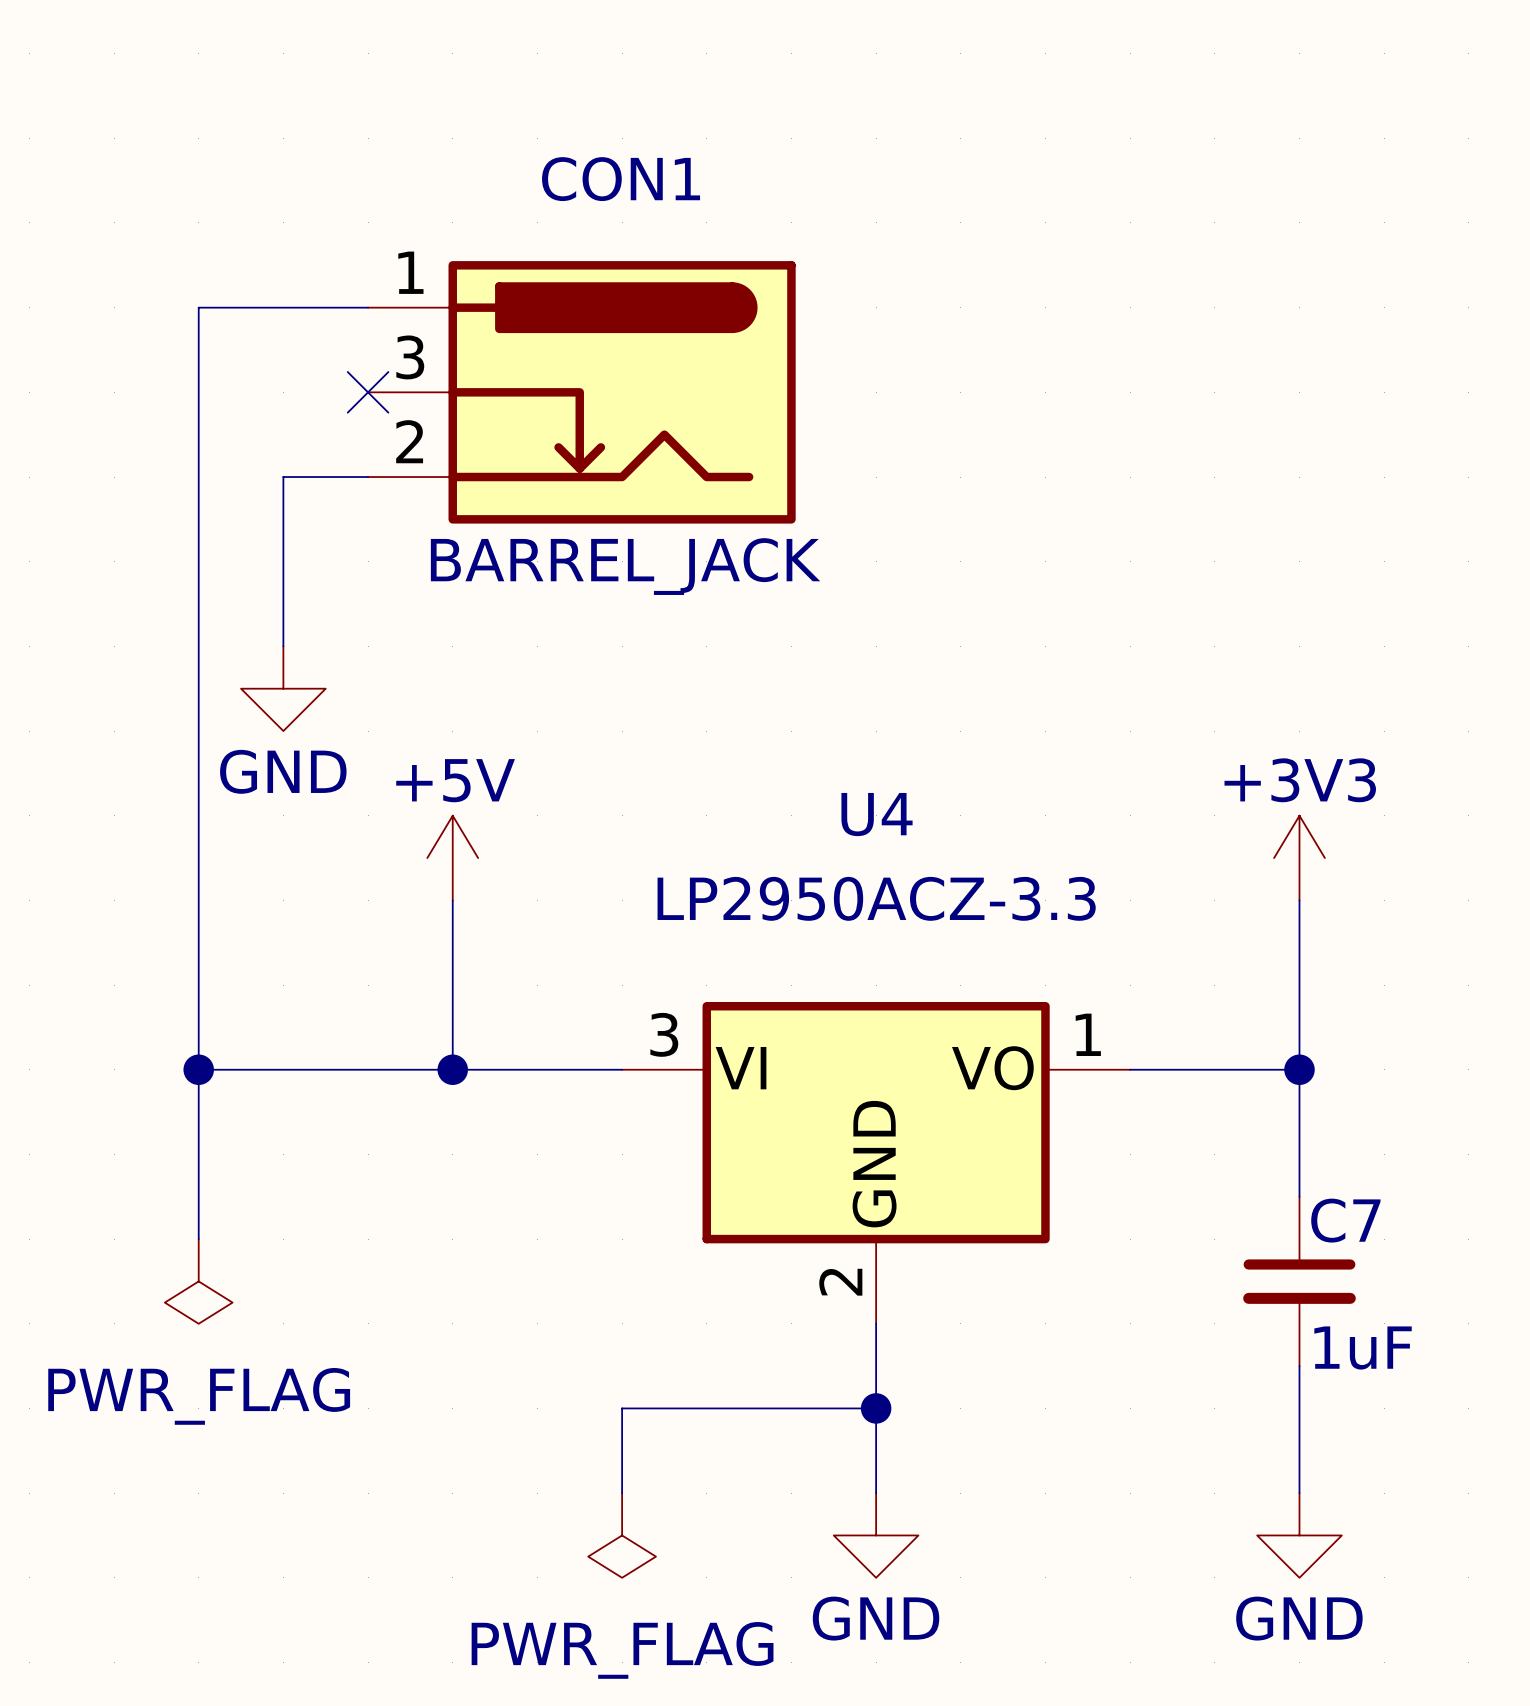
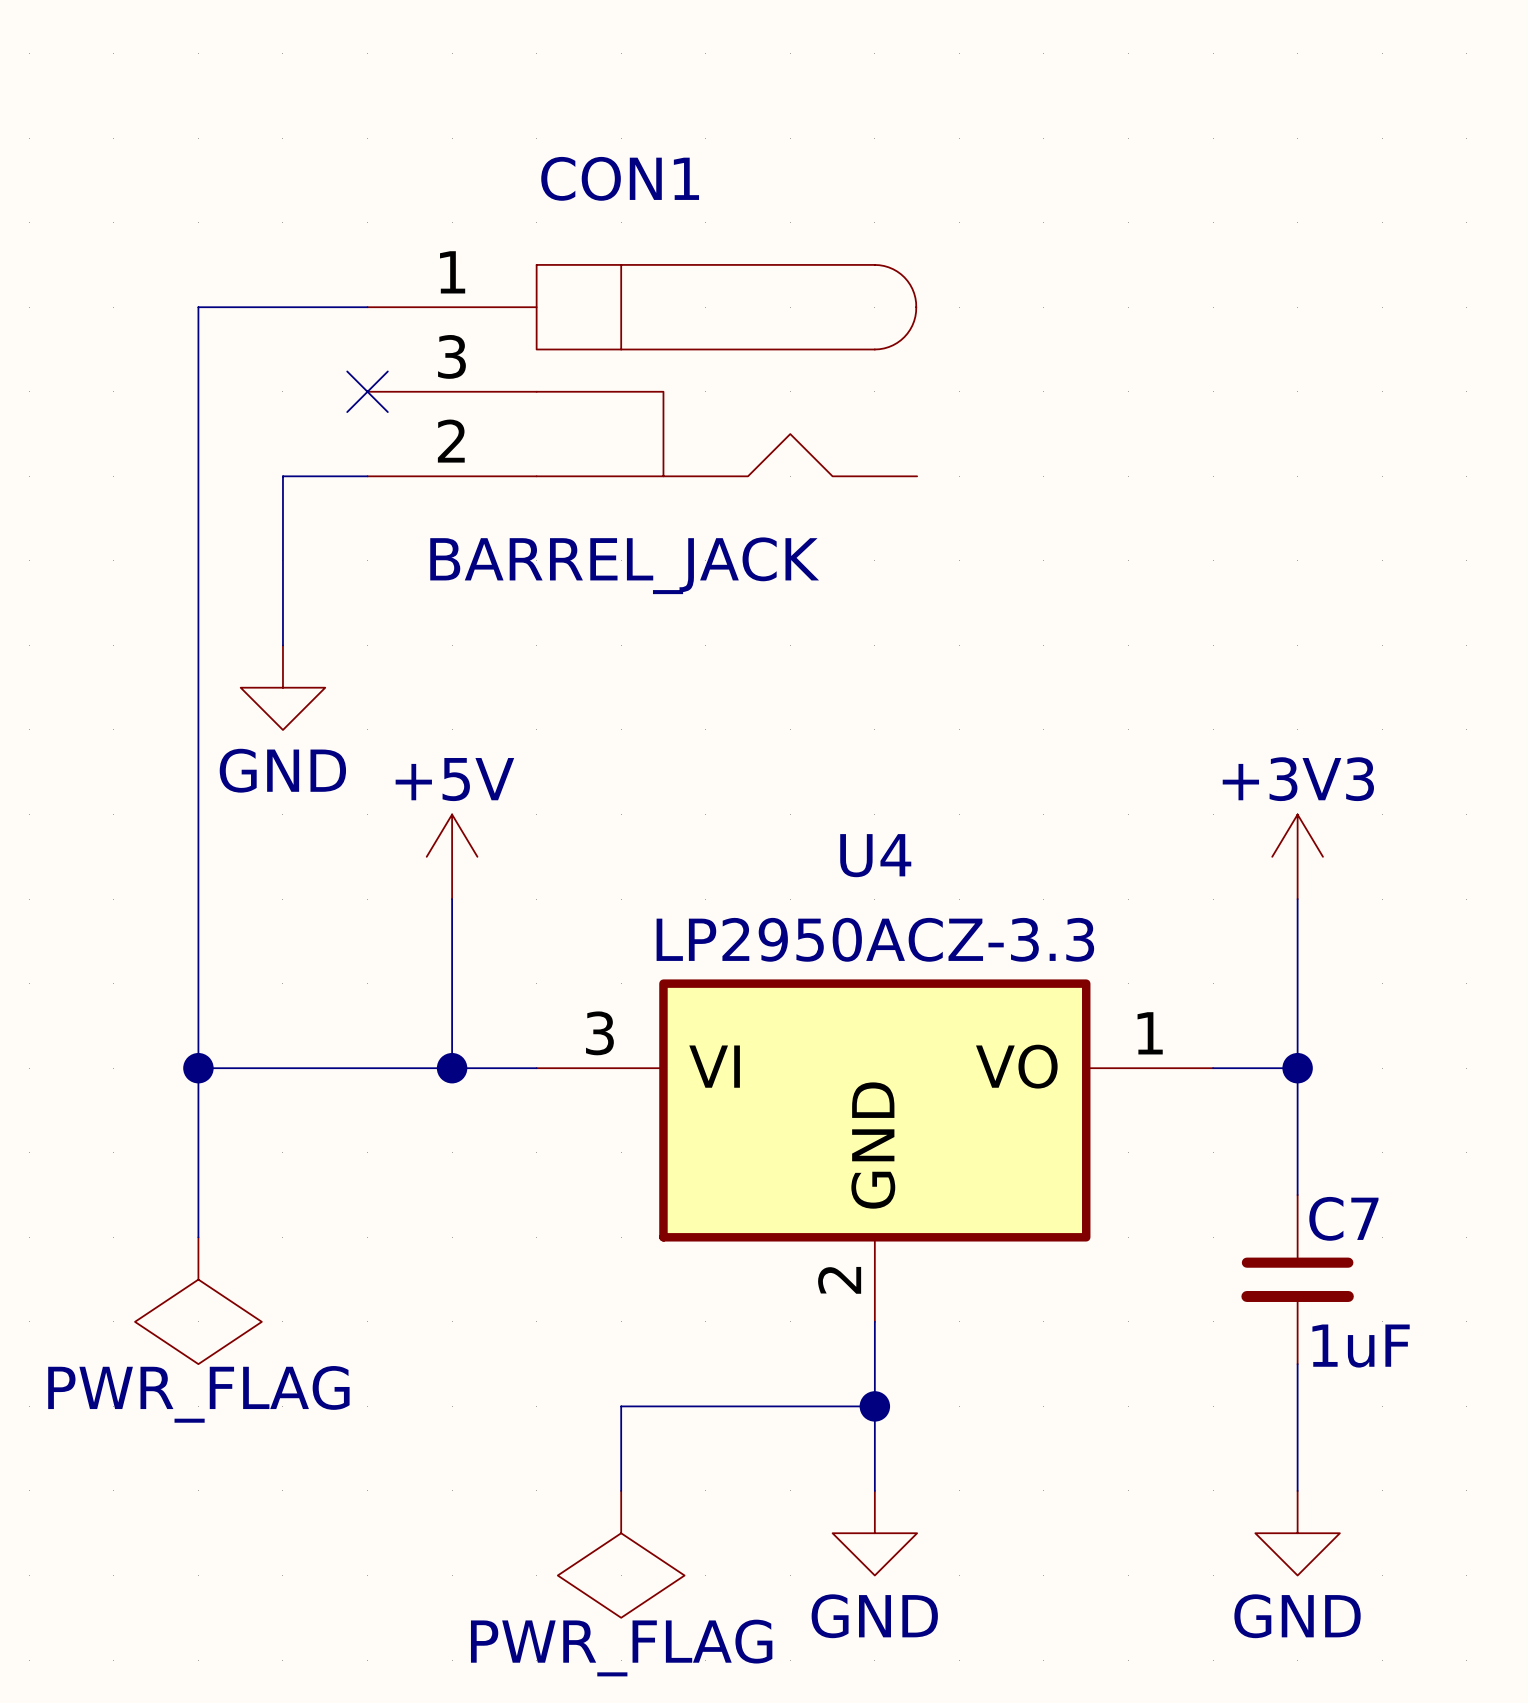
CON1 symbol: [368, 261, 796, 524] -> [367, 264, 918, 477]
U4 symbol: [622, 1002, 1131, 1324] -> [536, 979, 1214, 1322]
power symbol shape: [164, 1239, 233, 1324] -> [135, 1237, 262, 1365]
power symbol shape: [588, 1493, 656, 1578] -> [557, 1490, 685, 1618]

